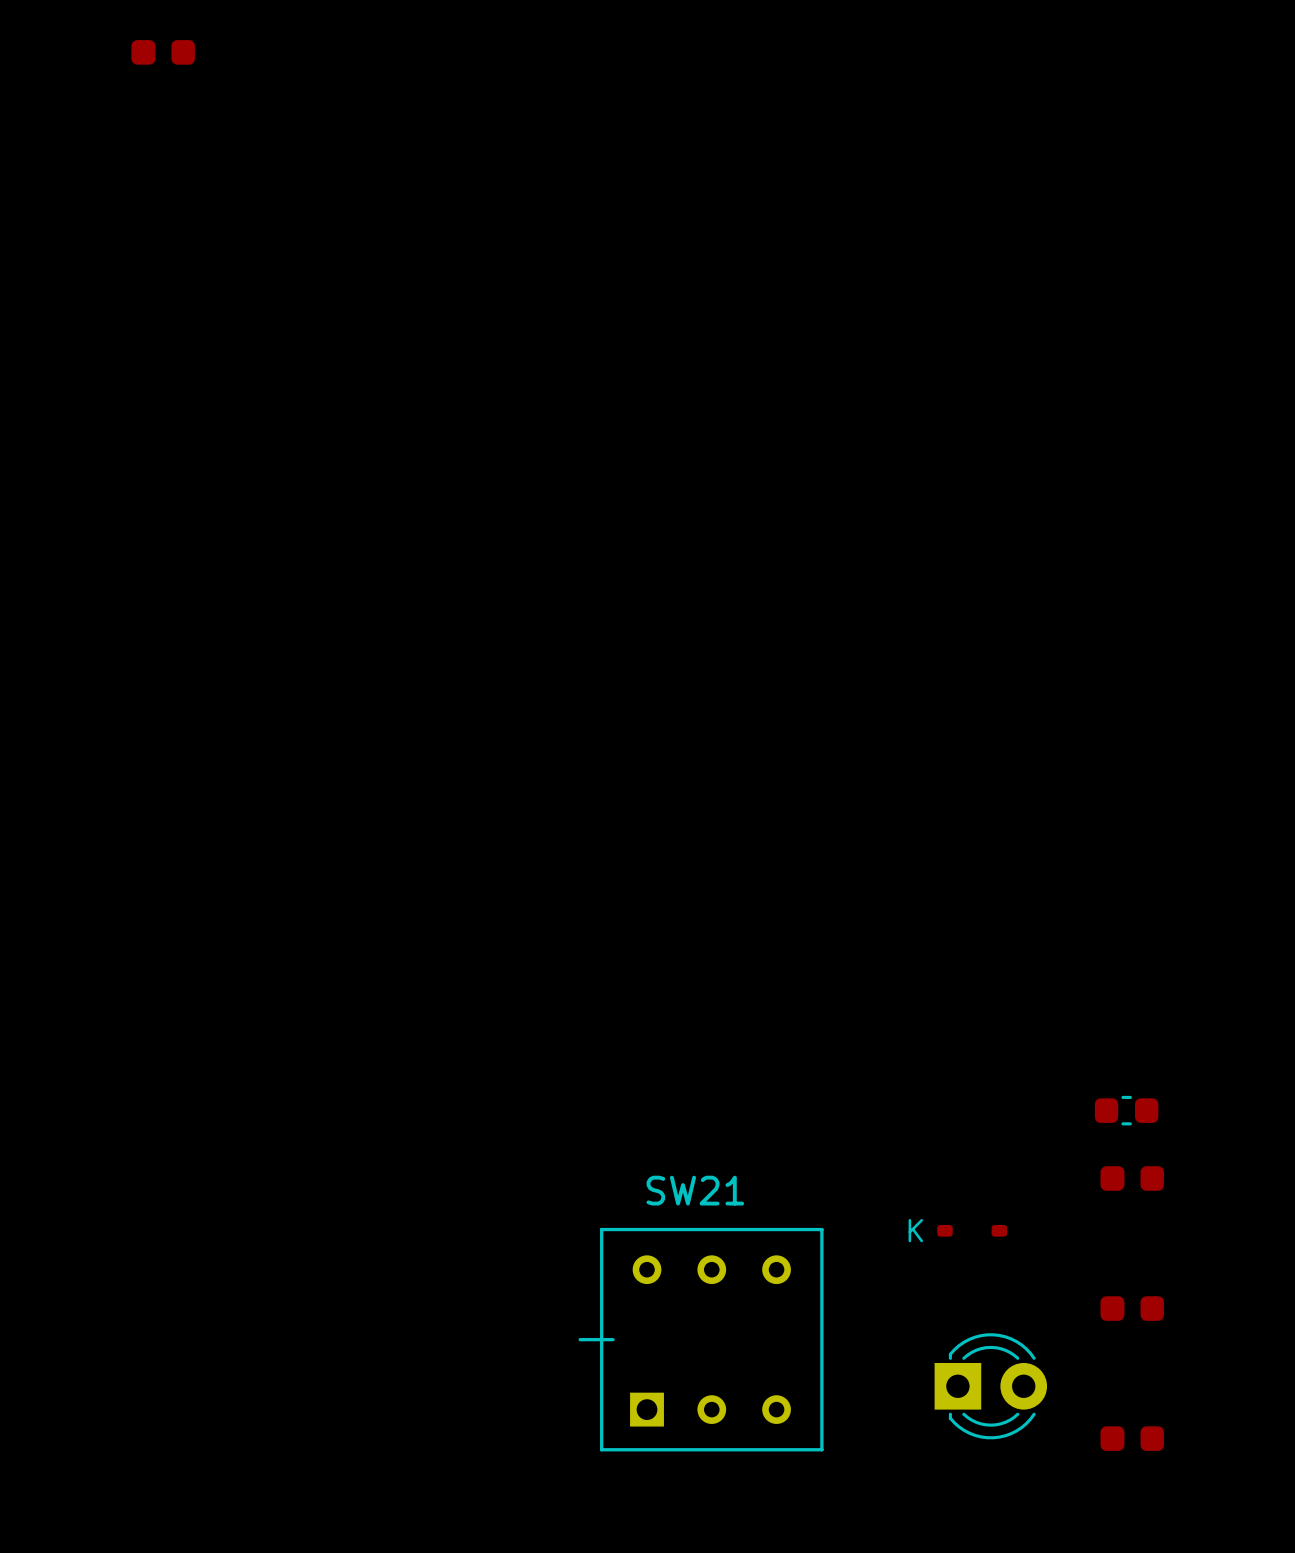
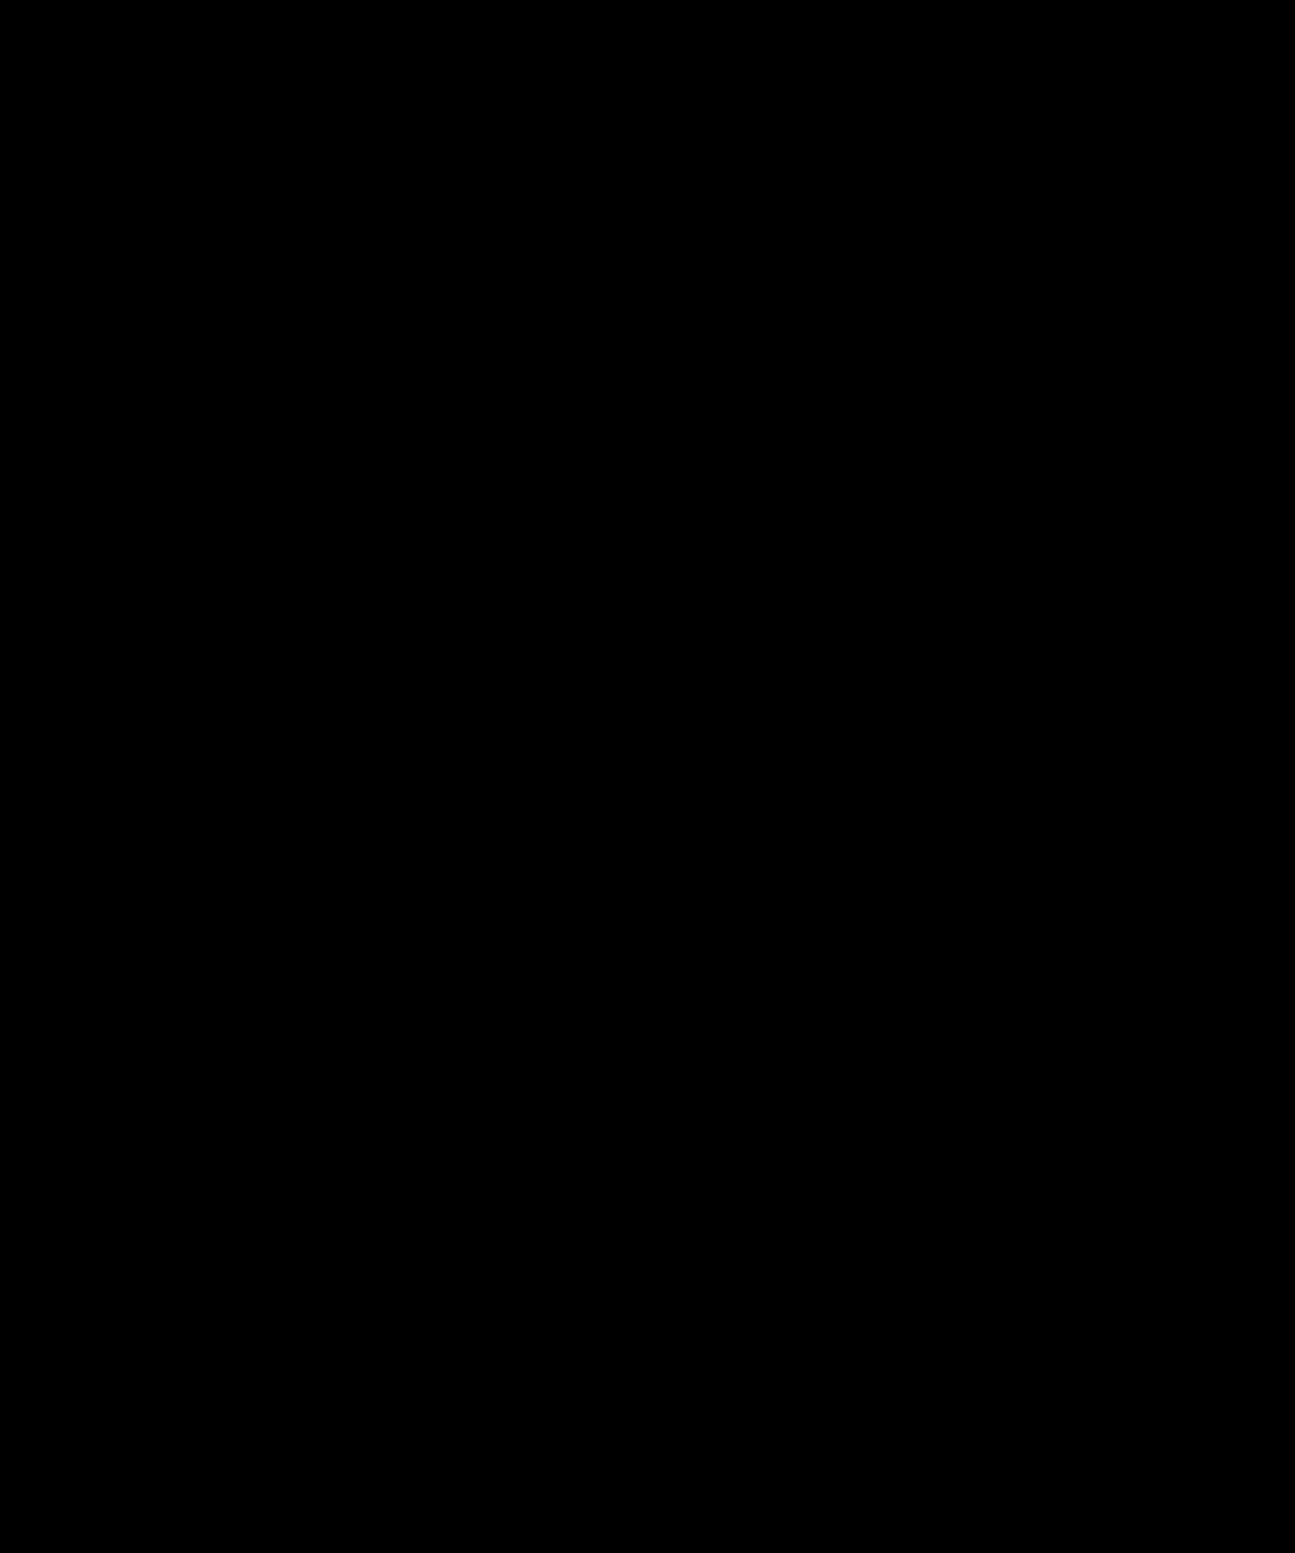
part: (163, 52) -> none
part: (1126, 1110) -> none
part: (1132, 1178) -> none
part: (972, 1230) -> none
part: (1132, 1308) -> none
SW21: (701, 1339) -> none
part: (990, 1386) -> none
part: (1132, 1438) -> none

